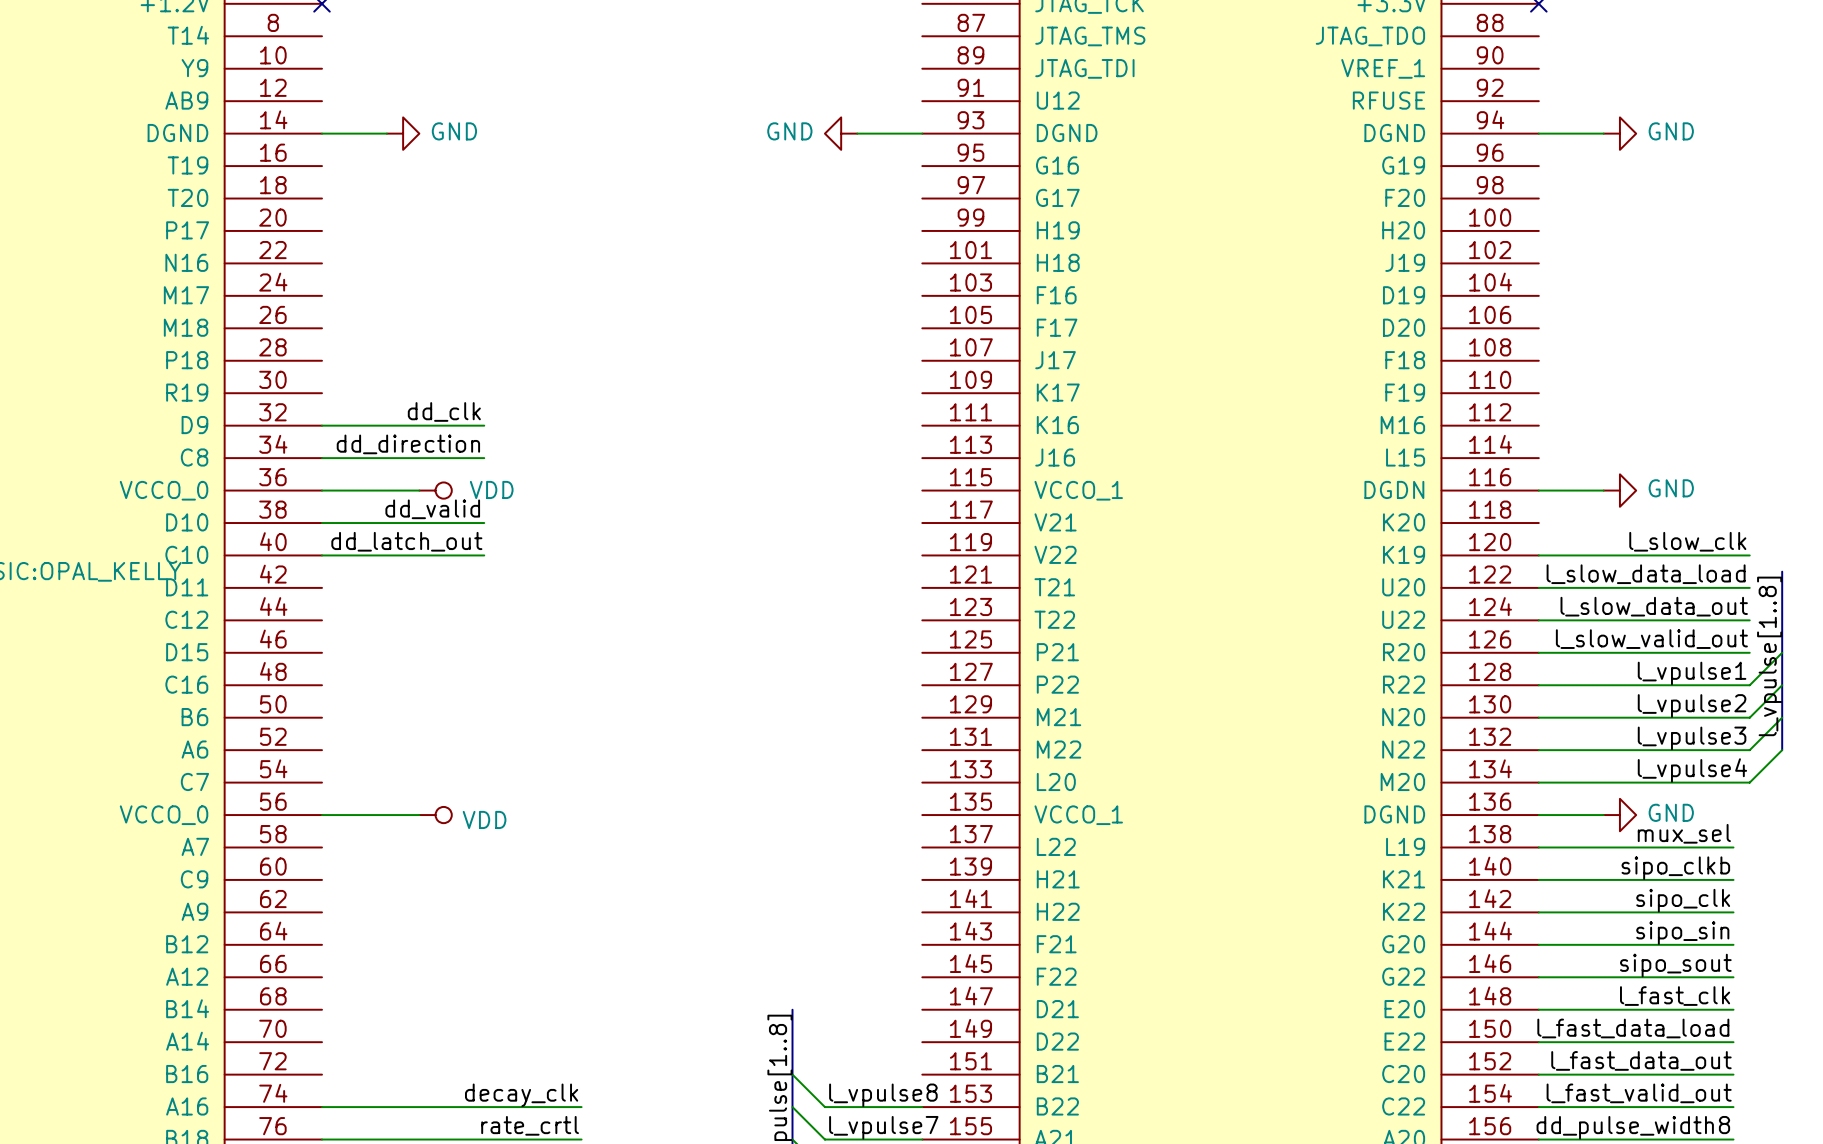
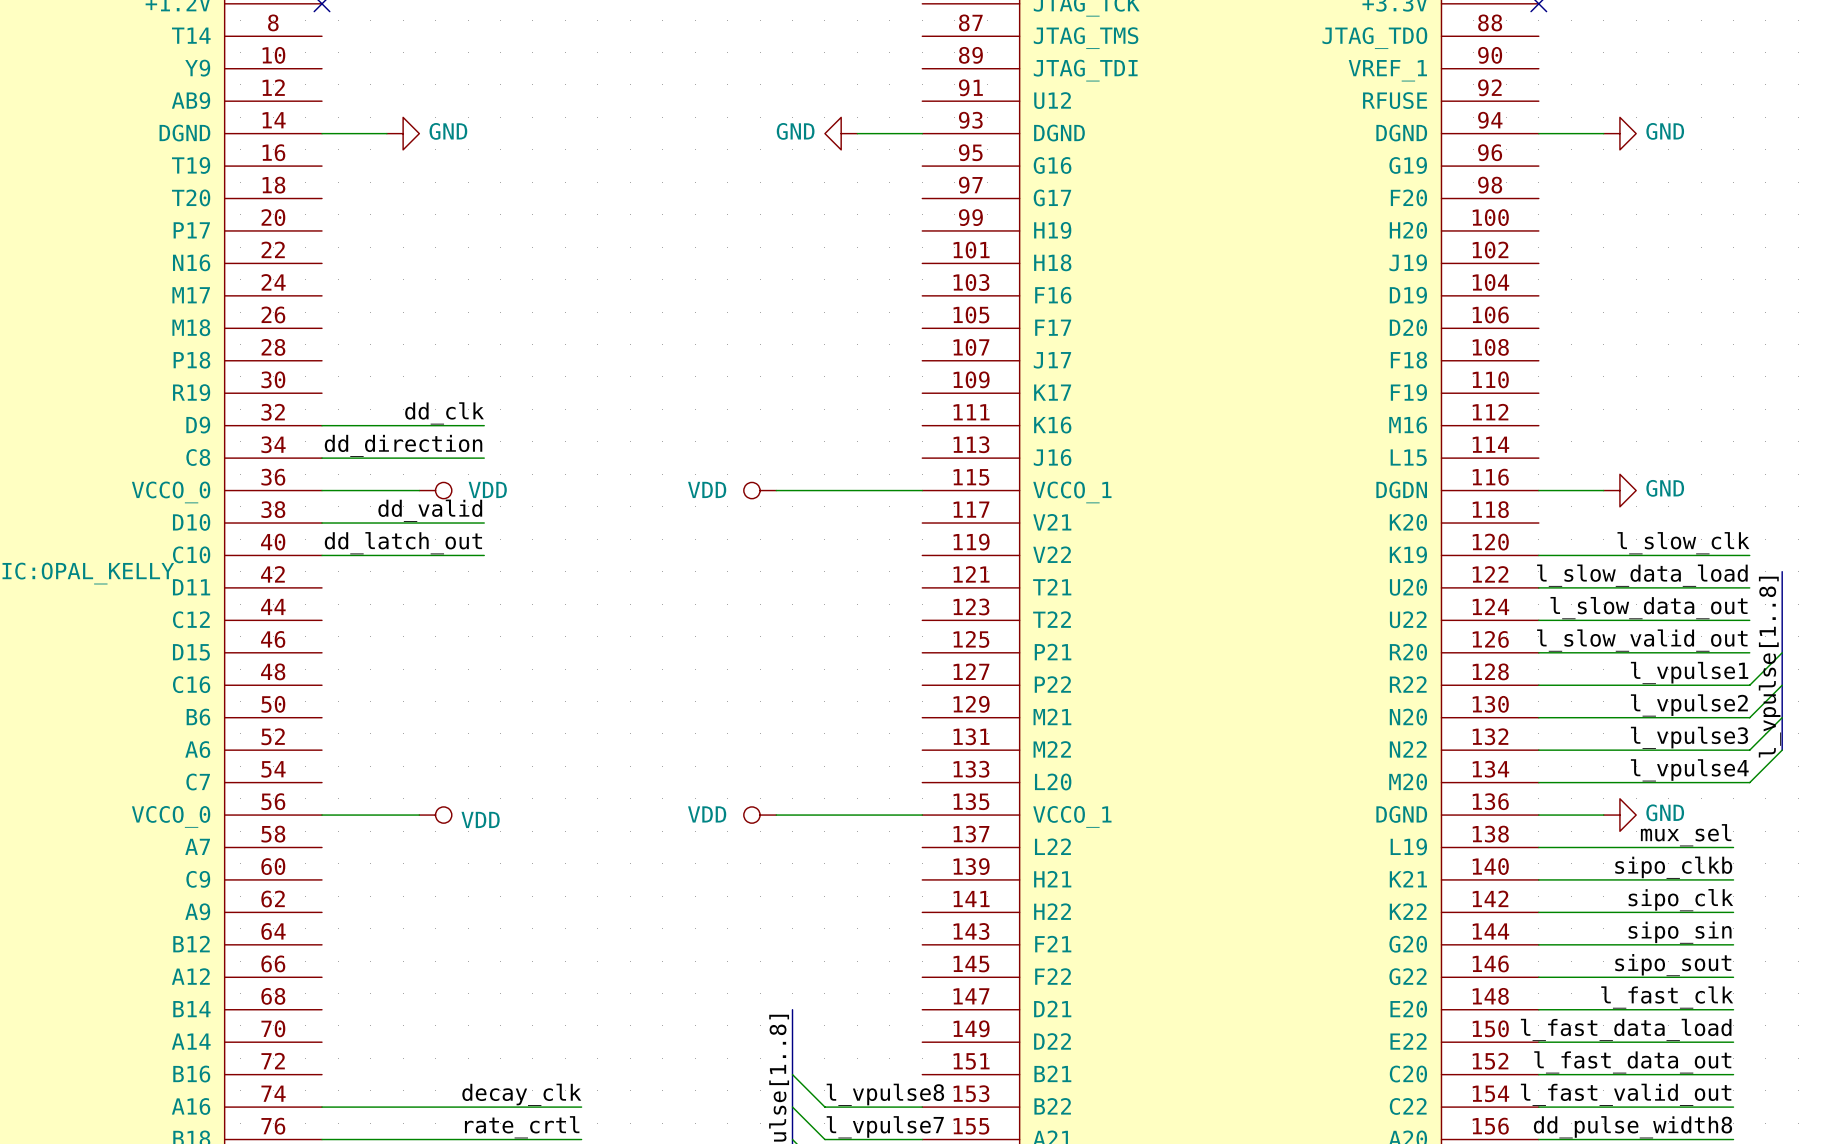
power symbol: none -> VDD (760, 490)
wire: none -> (776, 490) (922, 490)
power symbol: none -> VDD (760, 815)
wire: none -> (776, 815) (922, 815)

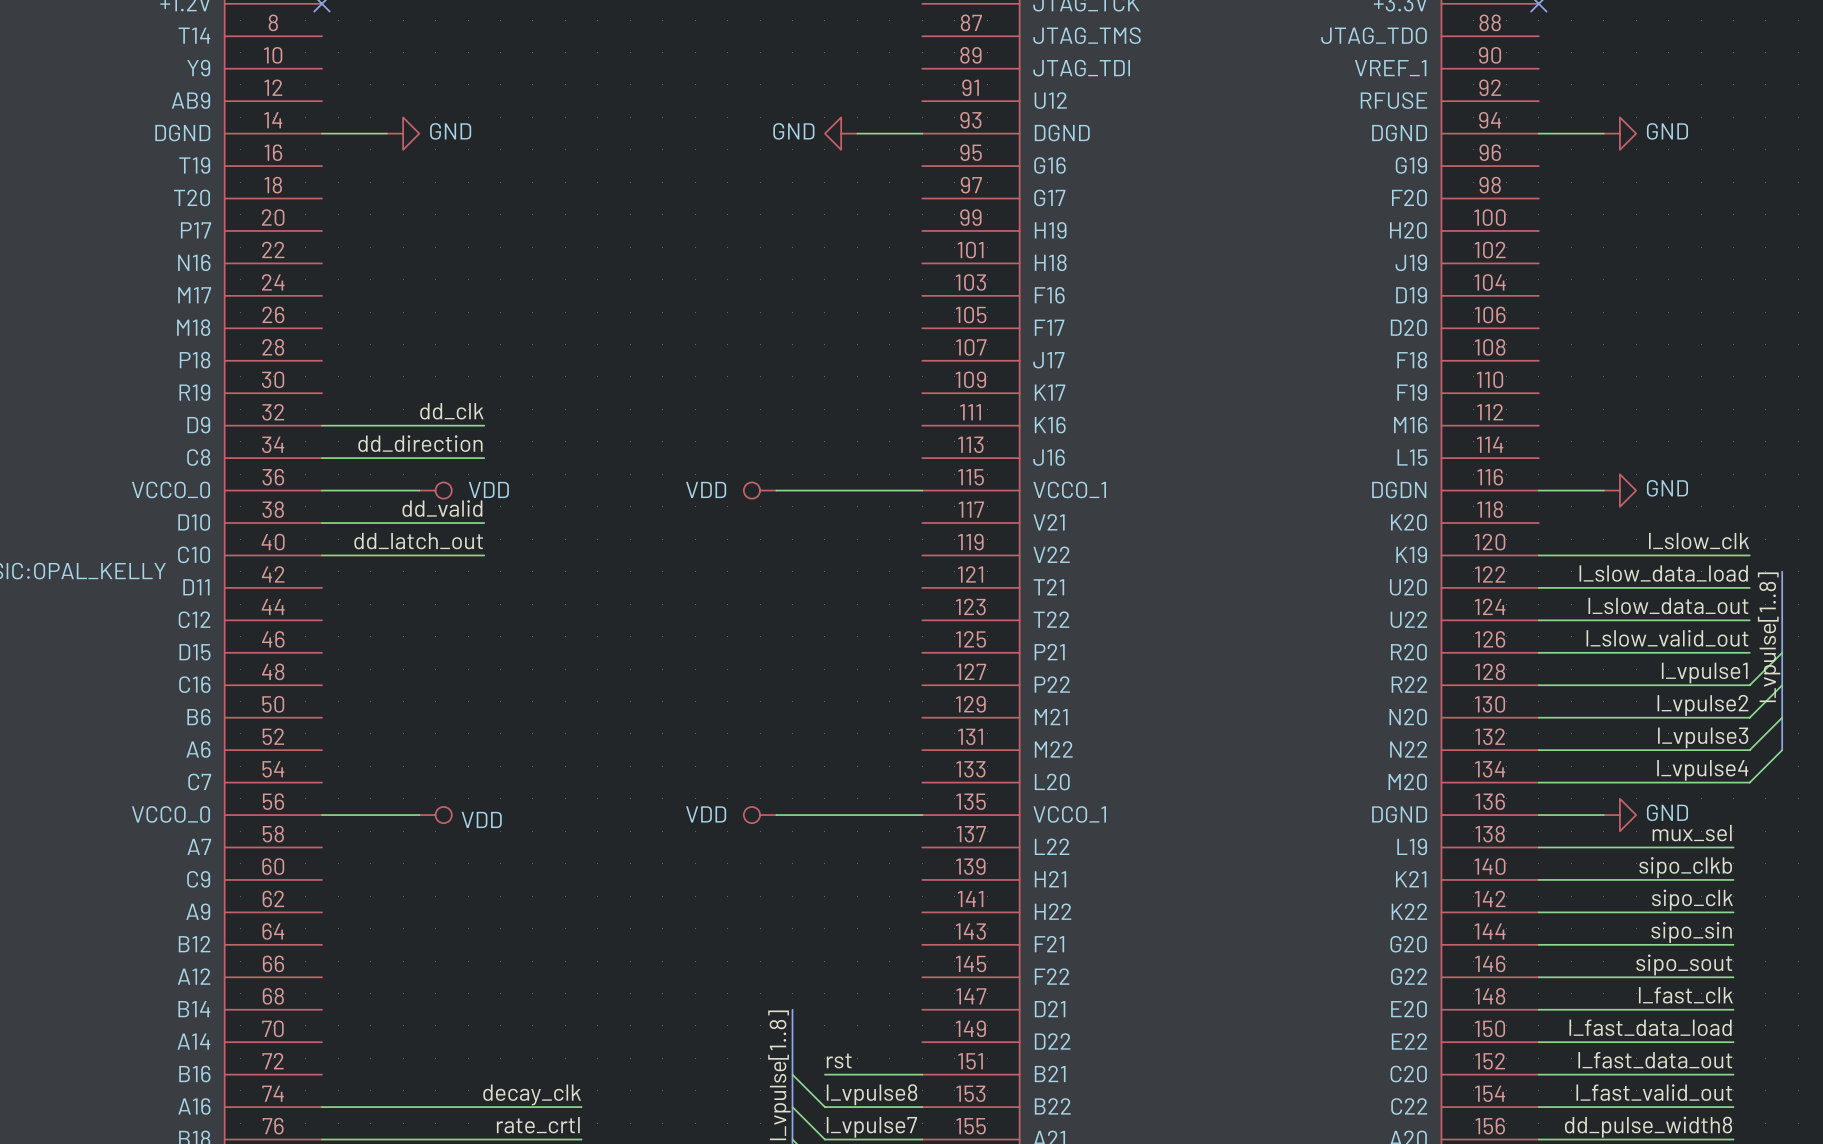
label: none -> rst (839, 1060)
wire: none -> (824, 1074) (922, 1074)

